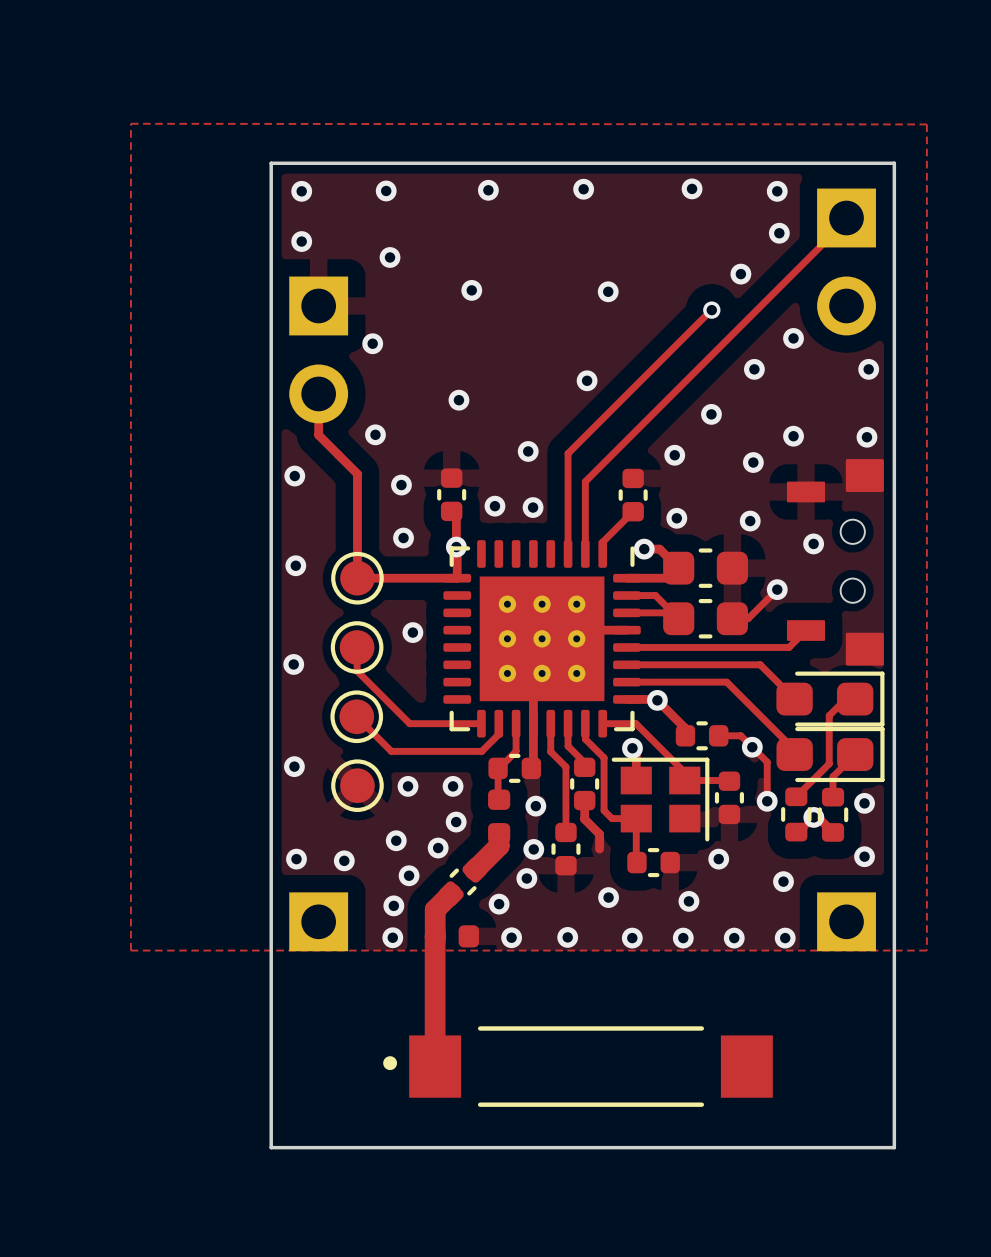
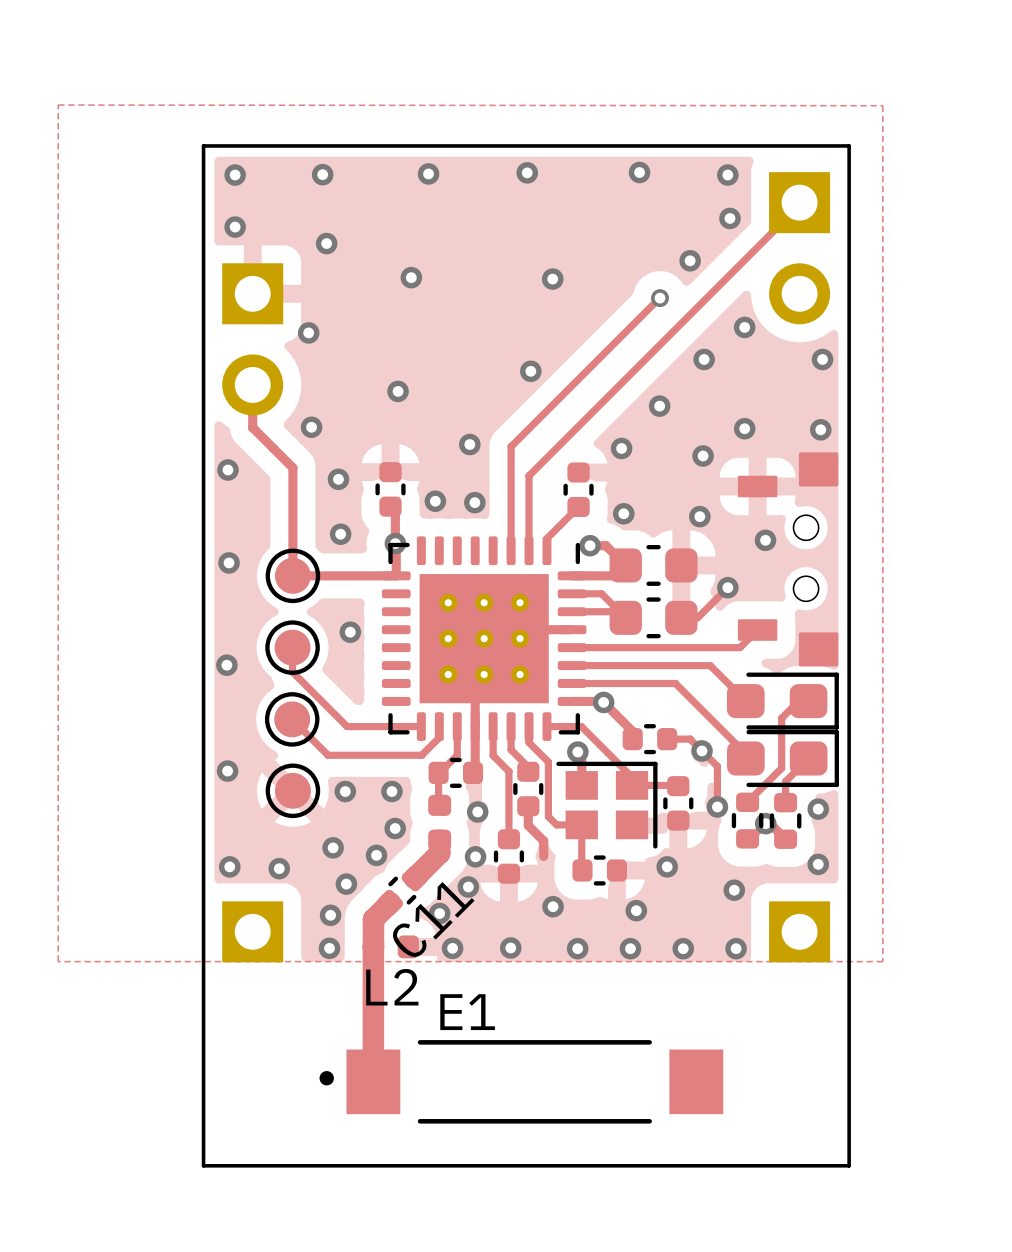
C11 name: none -> C11 (433, 919)
L2 name: none -> L2 (392, 987)
E1 name: none -> E1 (467, 1012)

